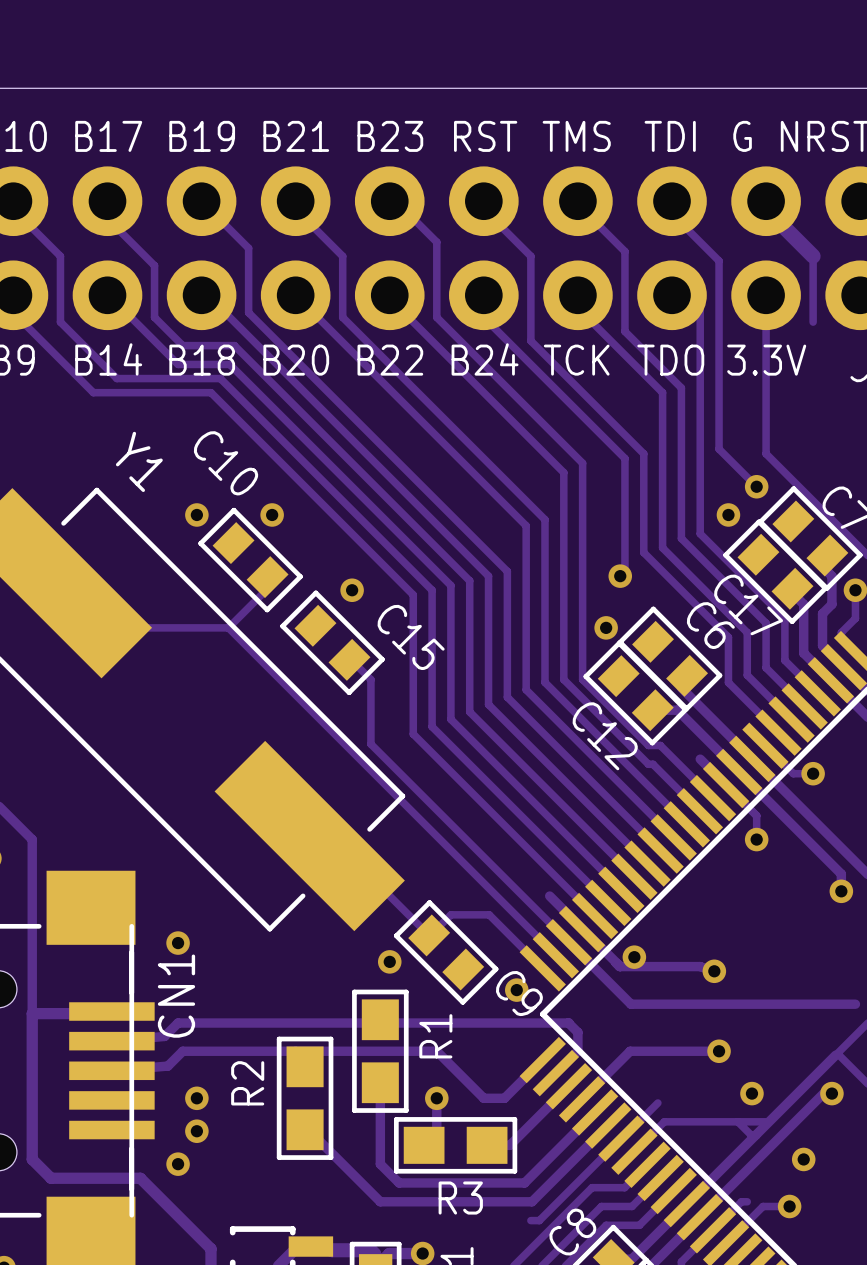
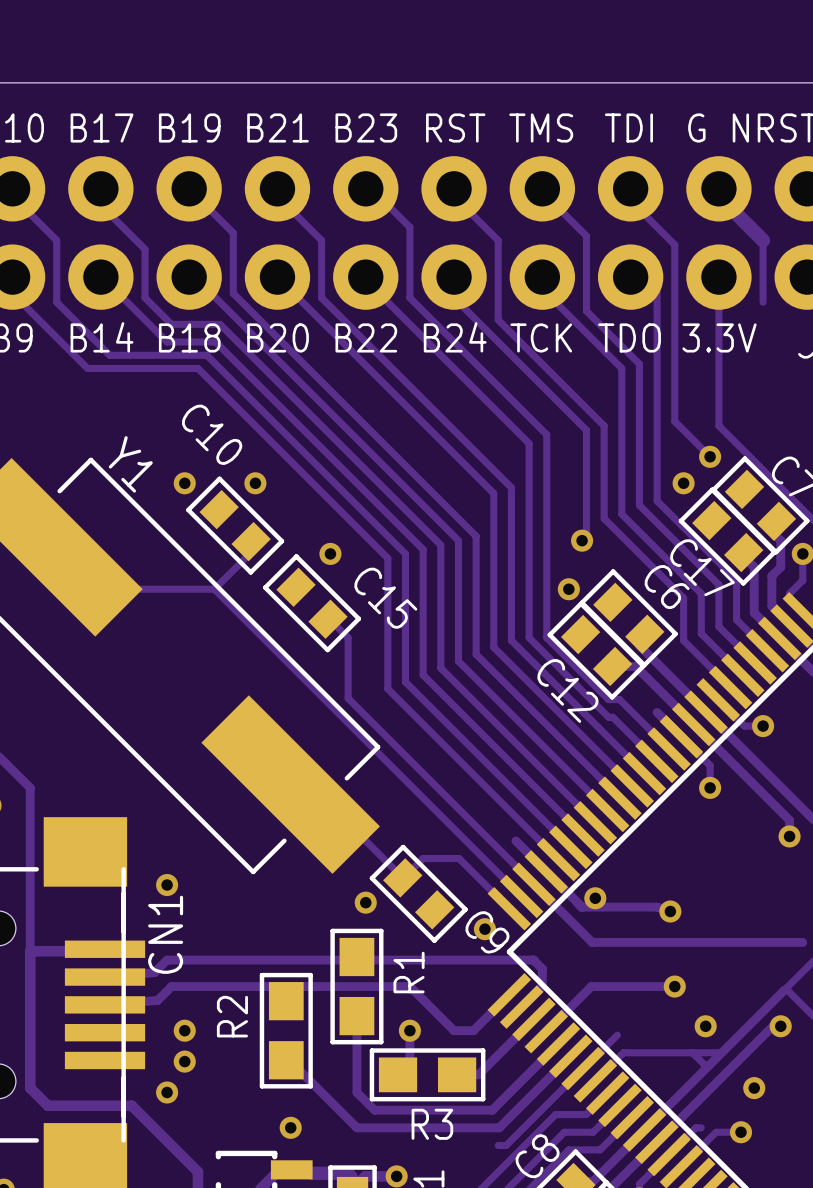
Y1 name position: Y1 (139, 461) -> Y1 (130, 464)
via: none -> (290, 1127)

